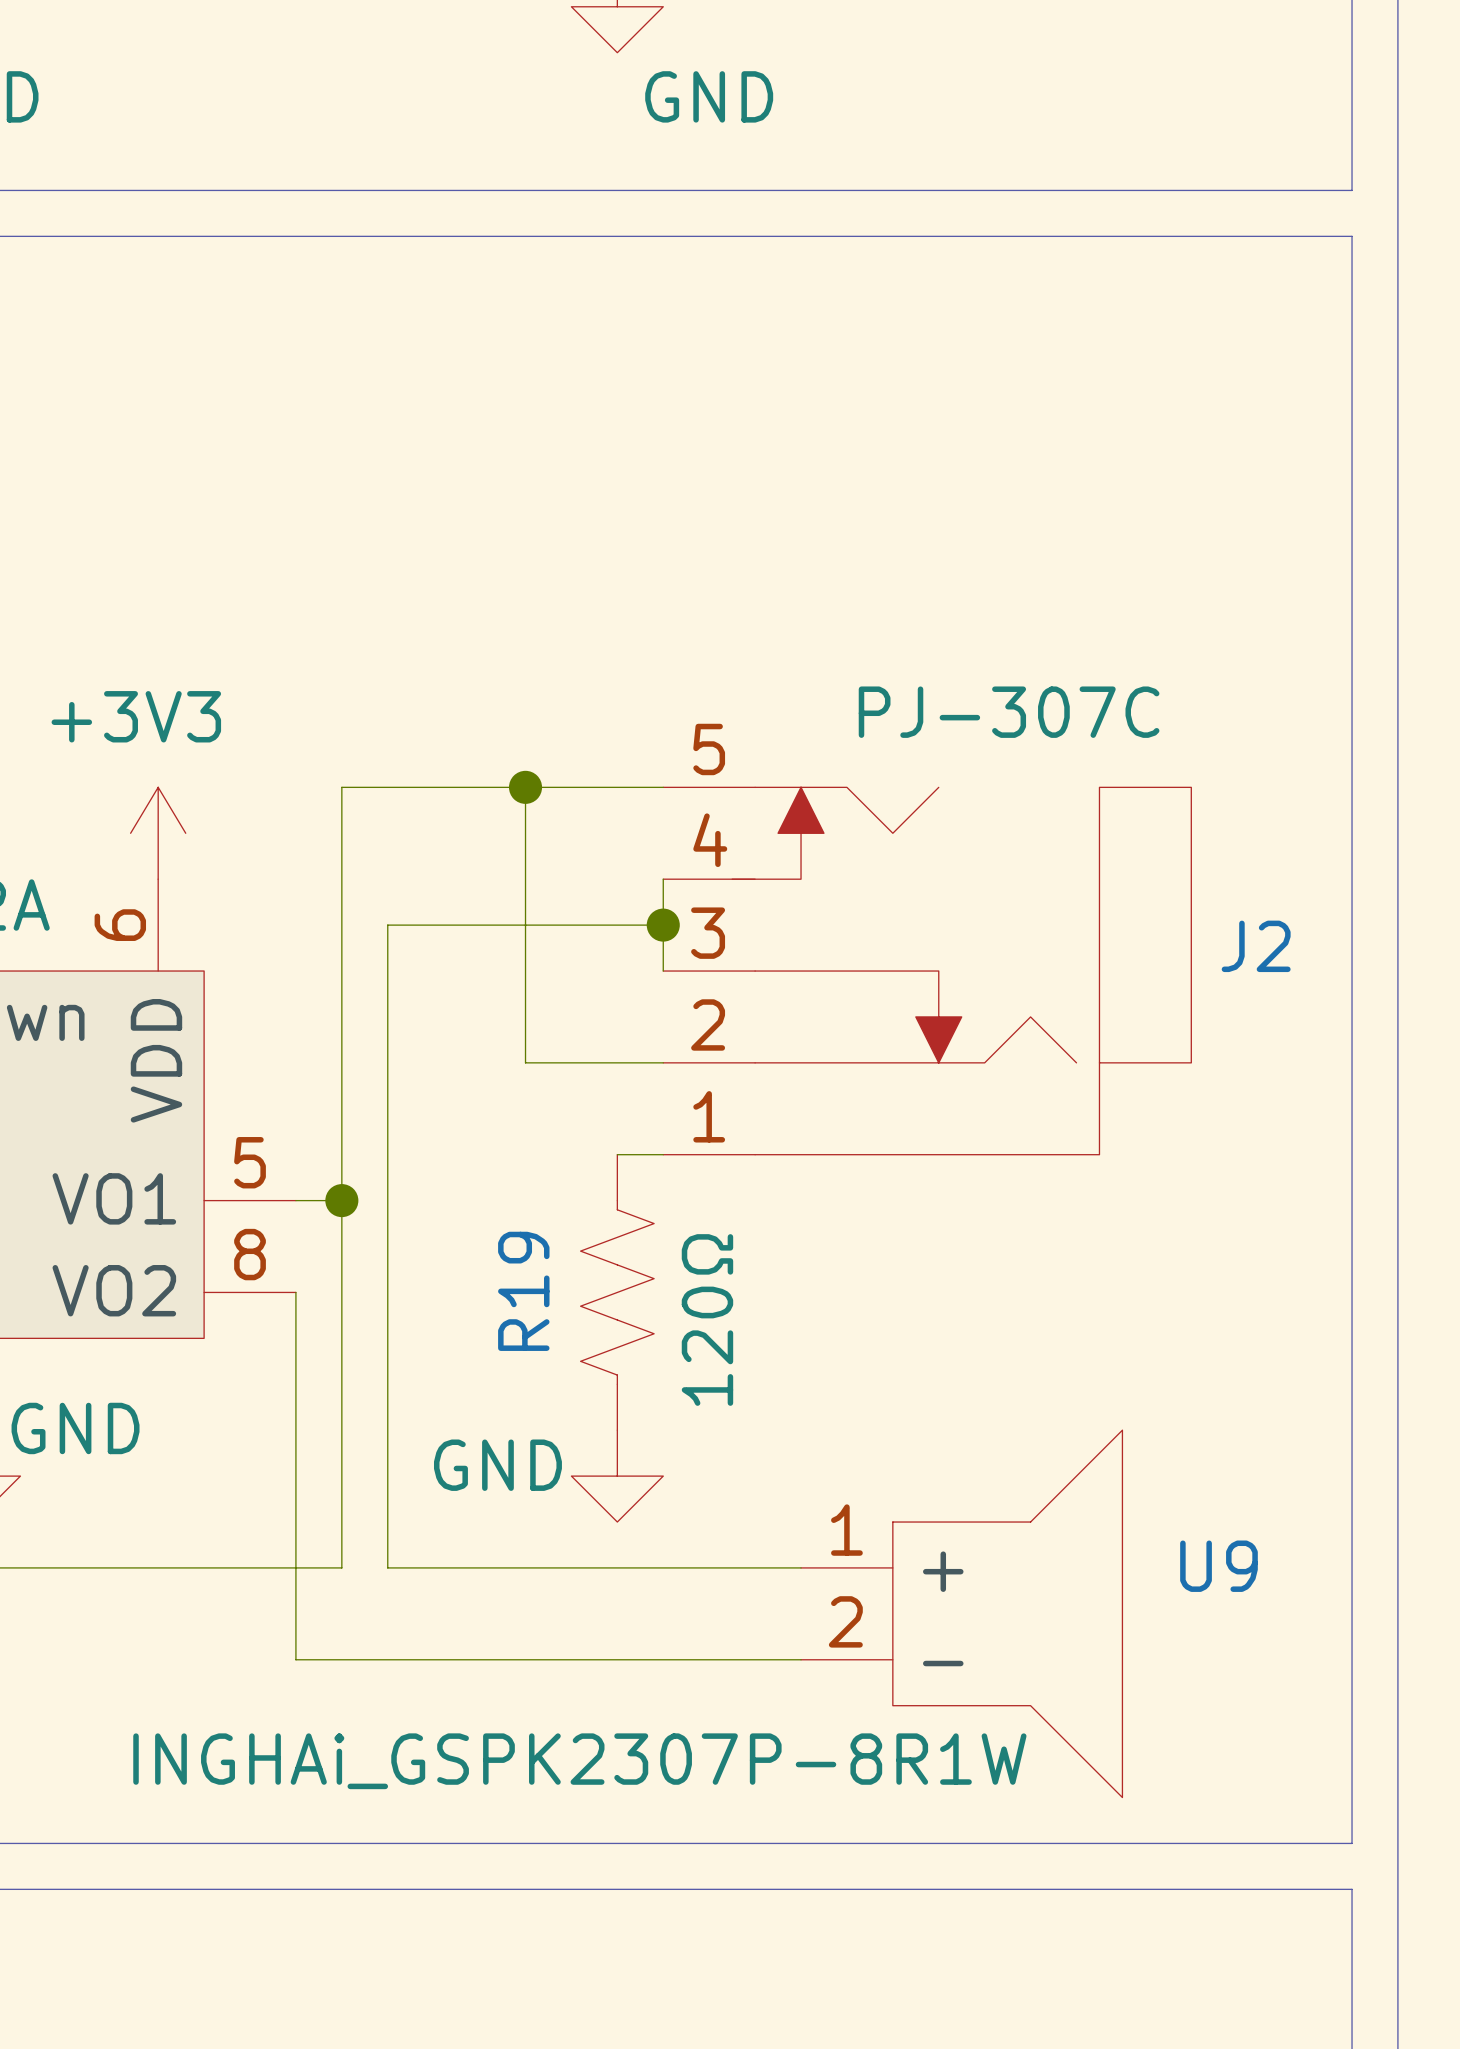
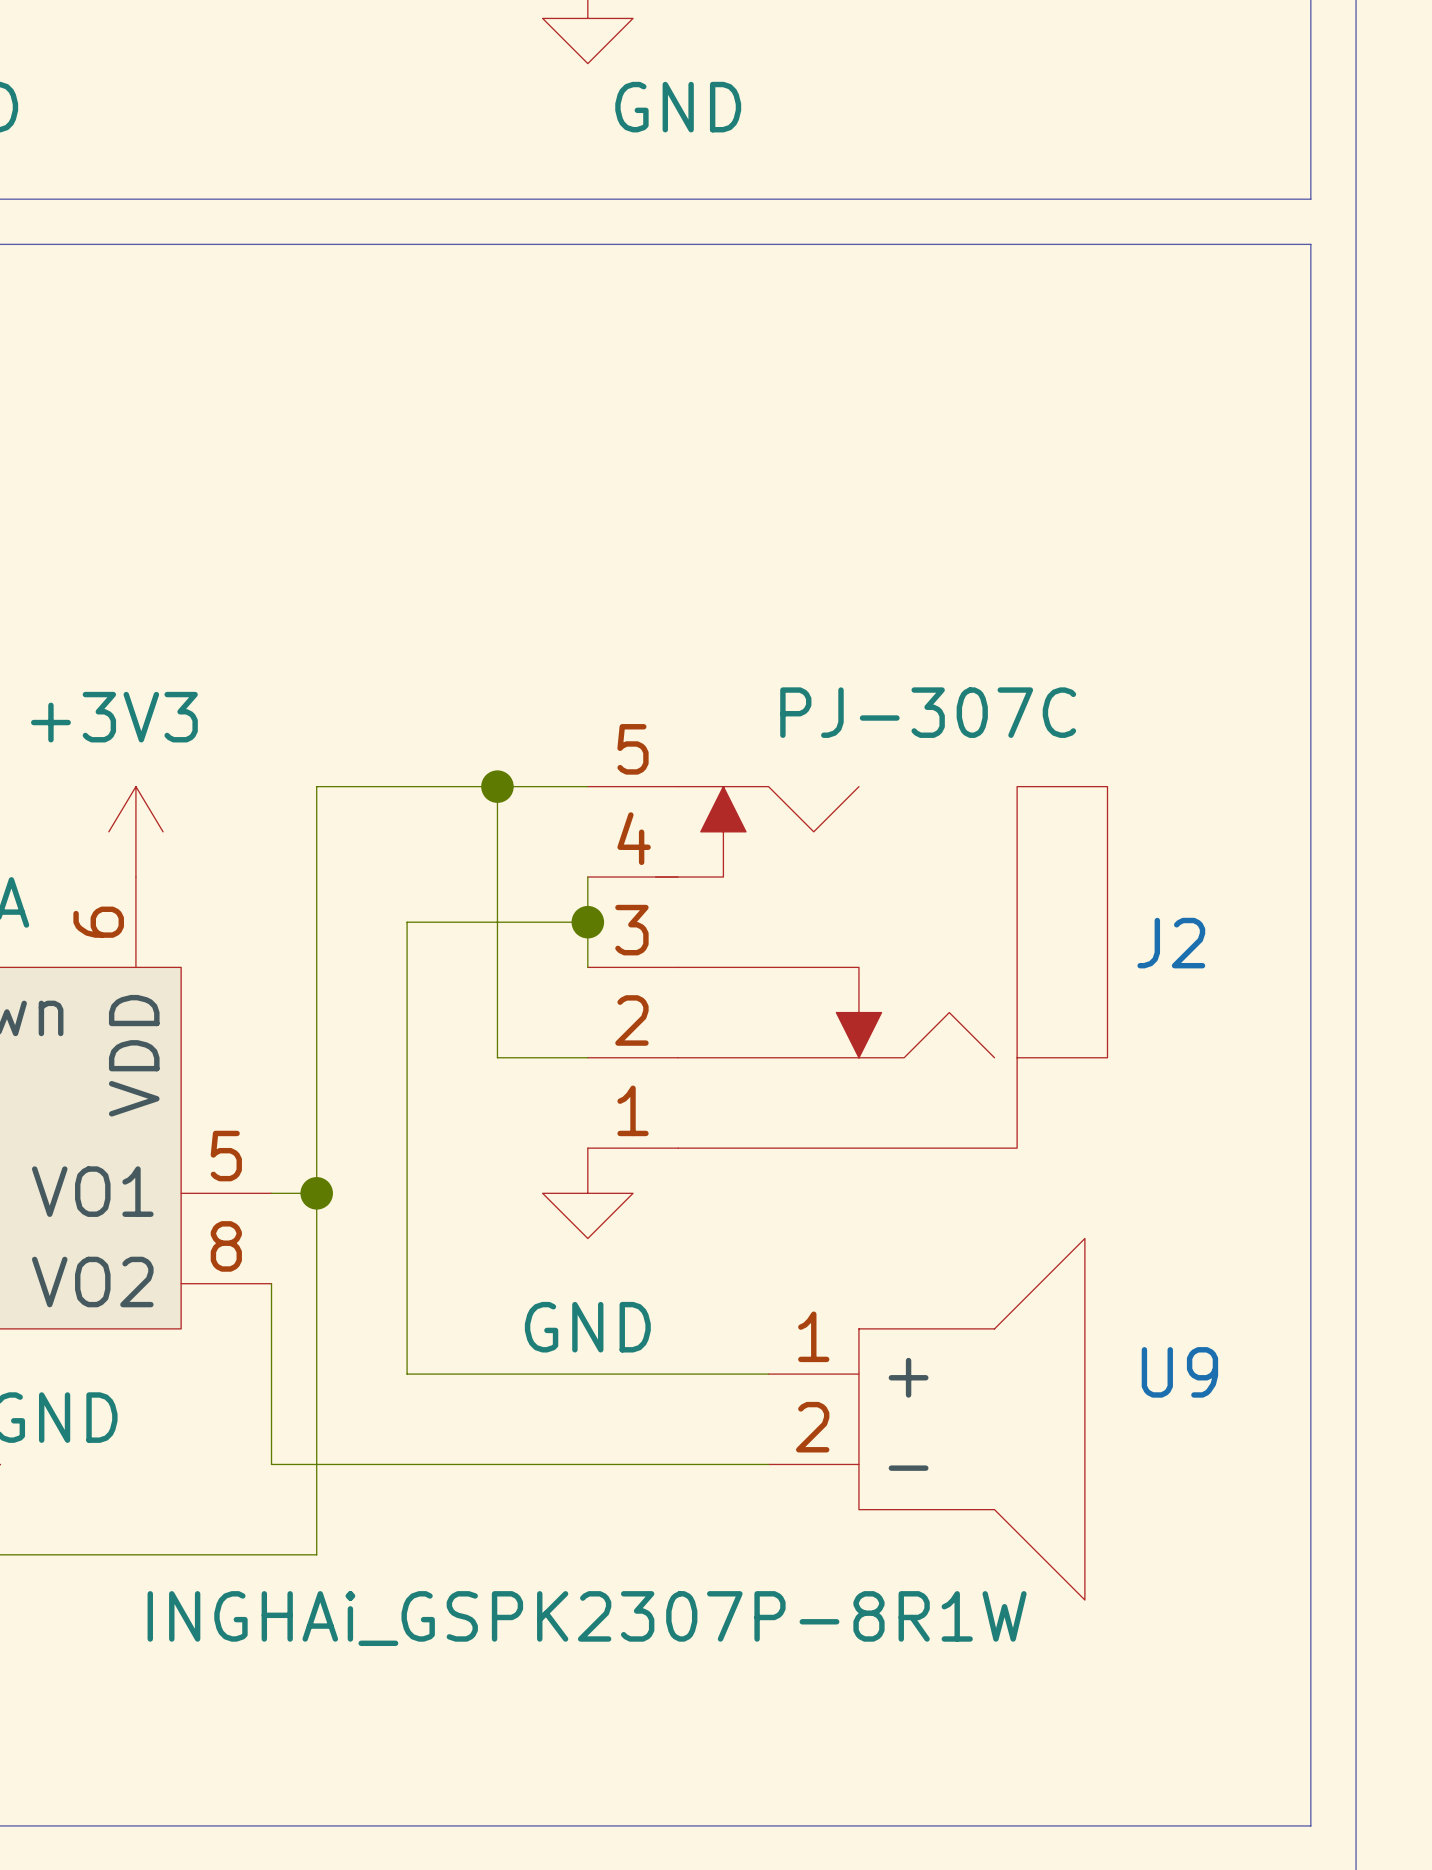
wire: (663, 879) (663, 971) -> (587, 877) (587, 967)
wire: (433, 925) (387, 925) (387, 1567) (801, 1567) -> (407, 922) (407, 1374) (768, 1374)
wire: (617, 925) (663, 925) -> none
junction position: (663, 925) -> (587, 922)
J2 position: (927, 971) -> (847, 967)
R19: 120Ω (617, 1292) -> none
power symbol text position: GND (497, 1465) -> GND (587, 1327)
wire: (295, 1476) (295, 1659) (801, 1659) -> (271, 1464) (768, 1464)
power symbol position: GND (617, 1476) -> GND (587, 1193)
U9 position: (961, 1613) -> (926, 1419)
U9 value position: INGHAi_GSPK2307P-8R1W (579, 1761) -> INGHAi_GSPK2307P-8R1W (587, 1618)

